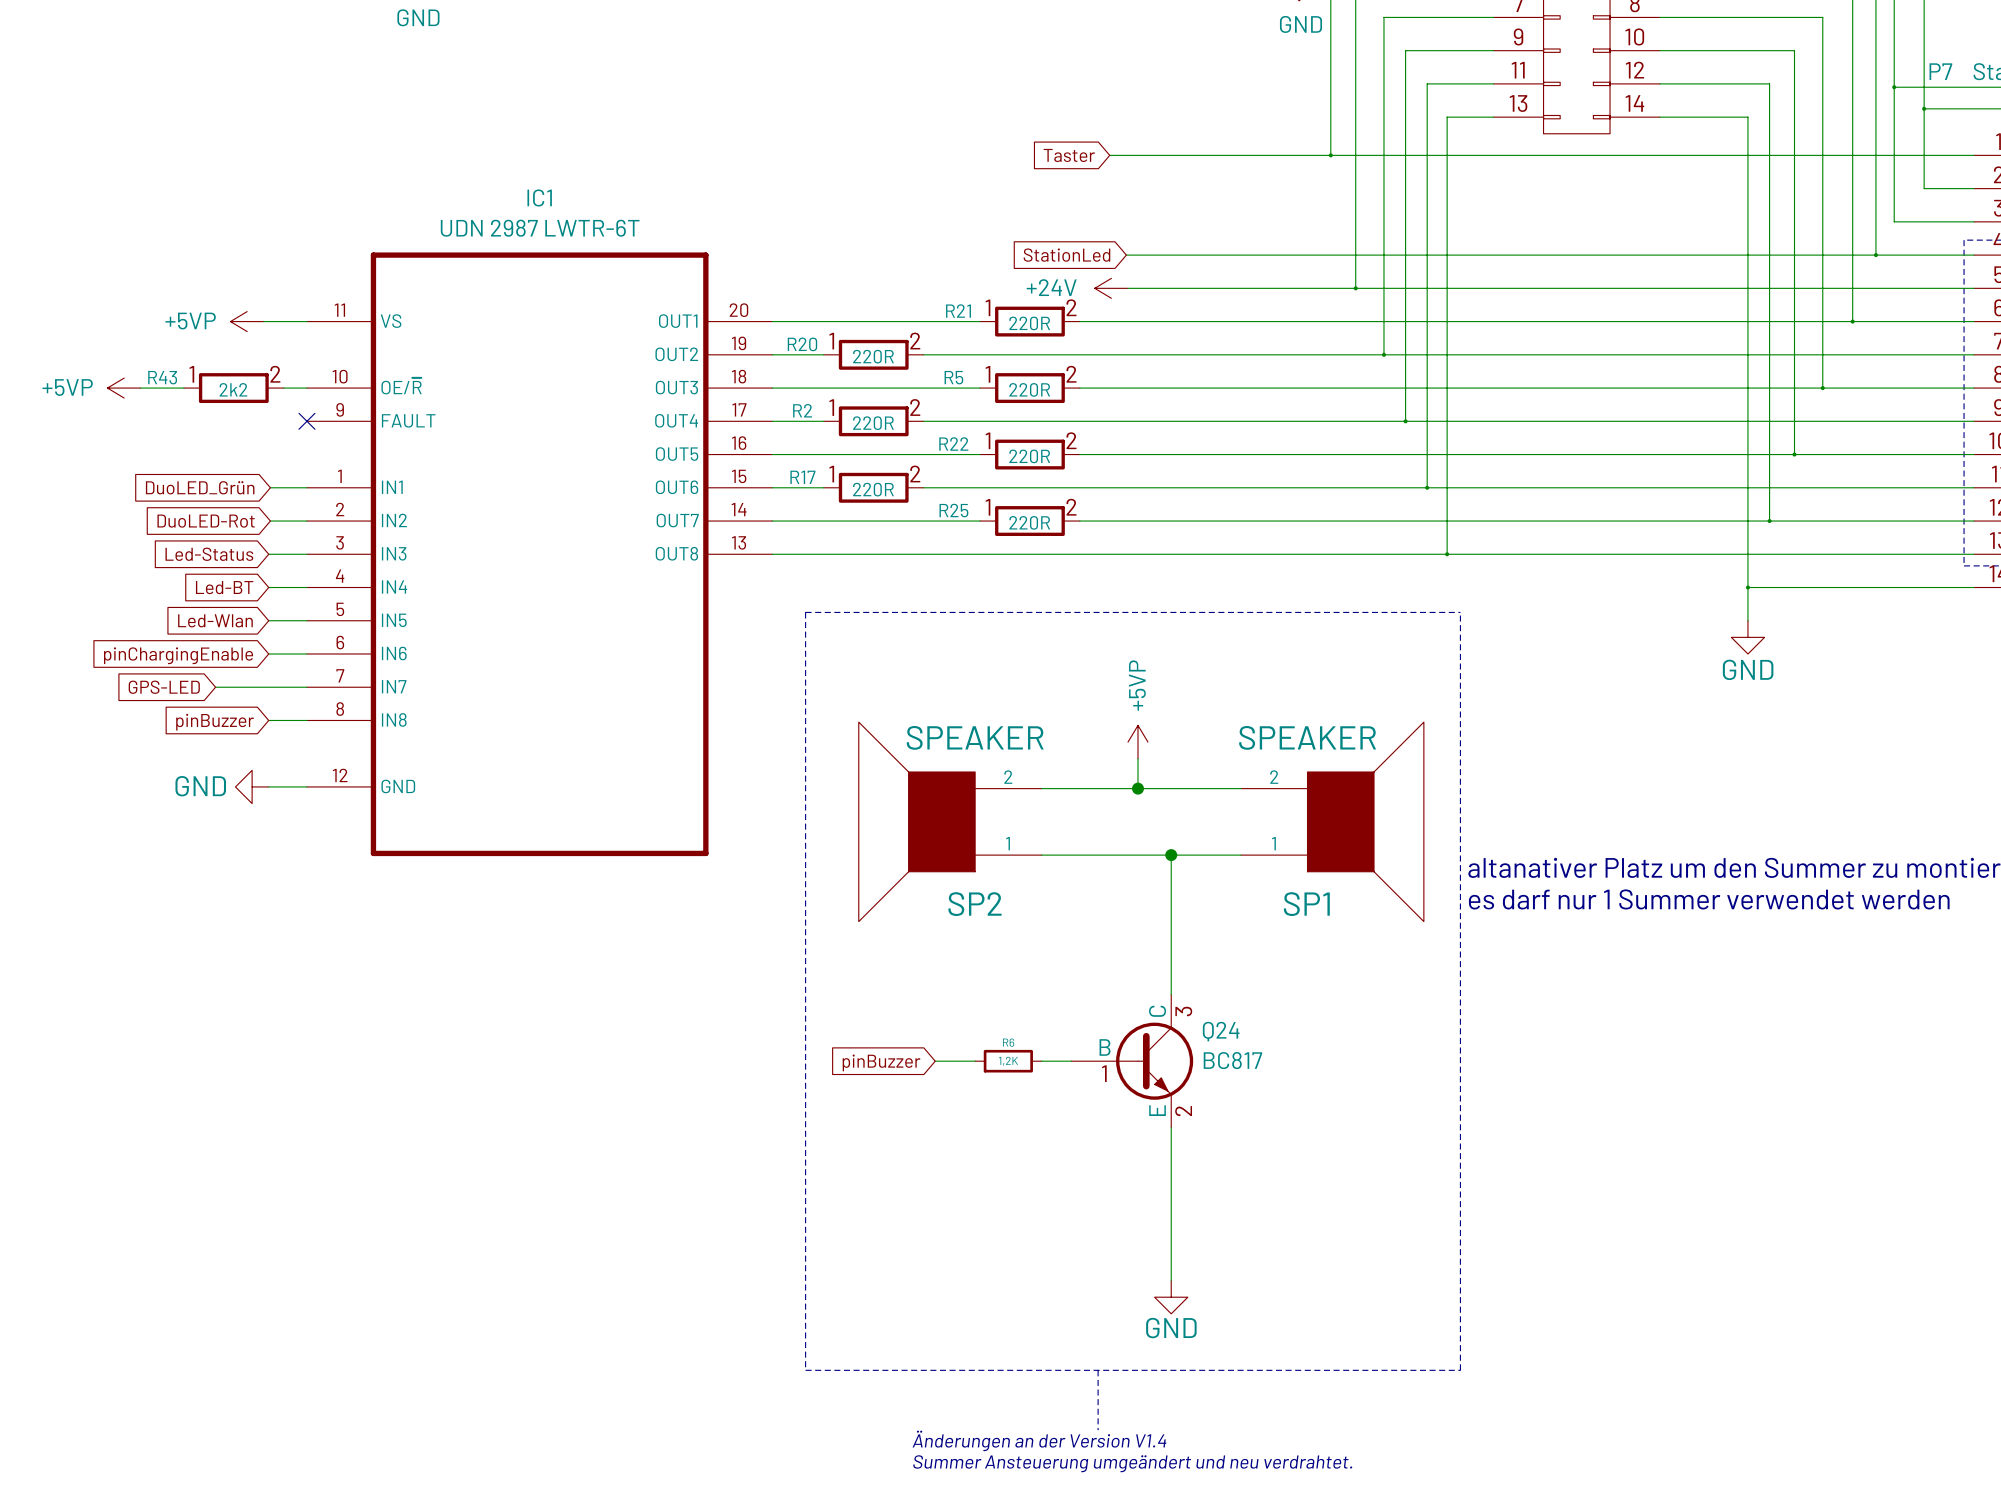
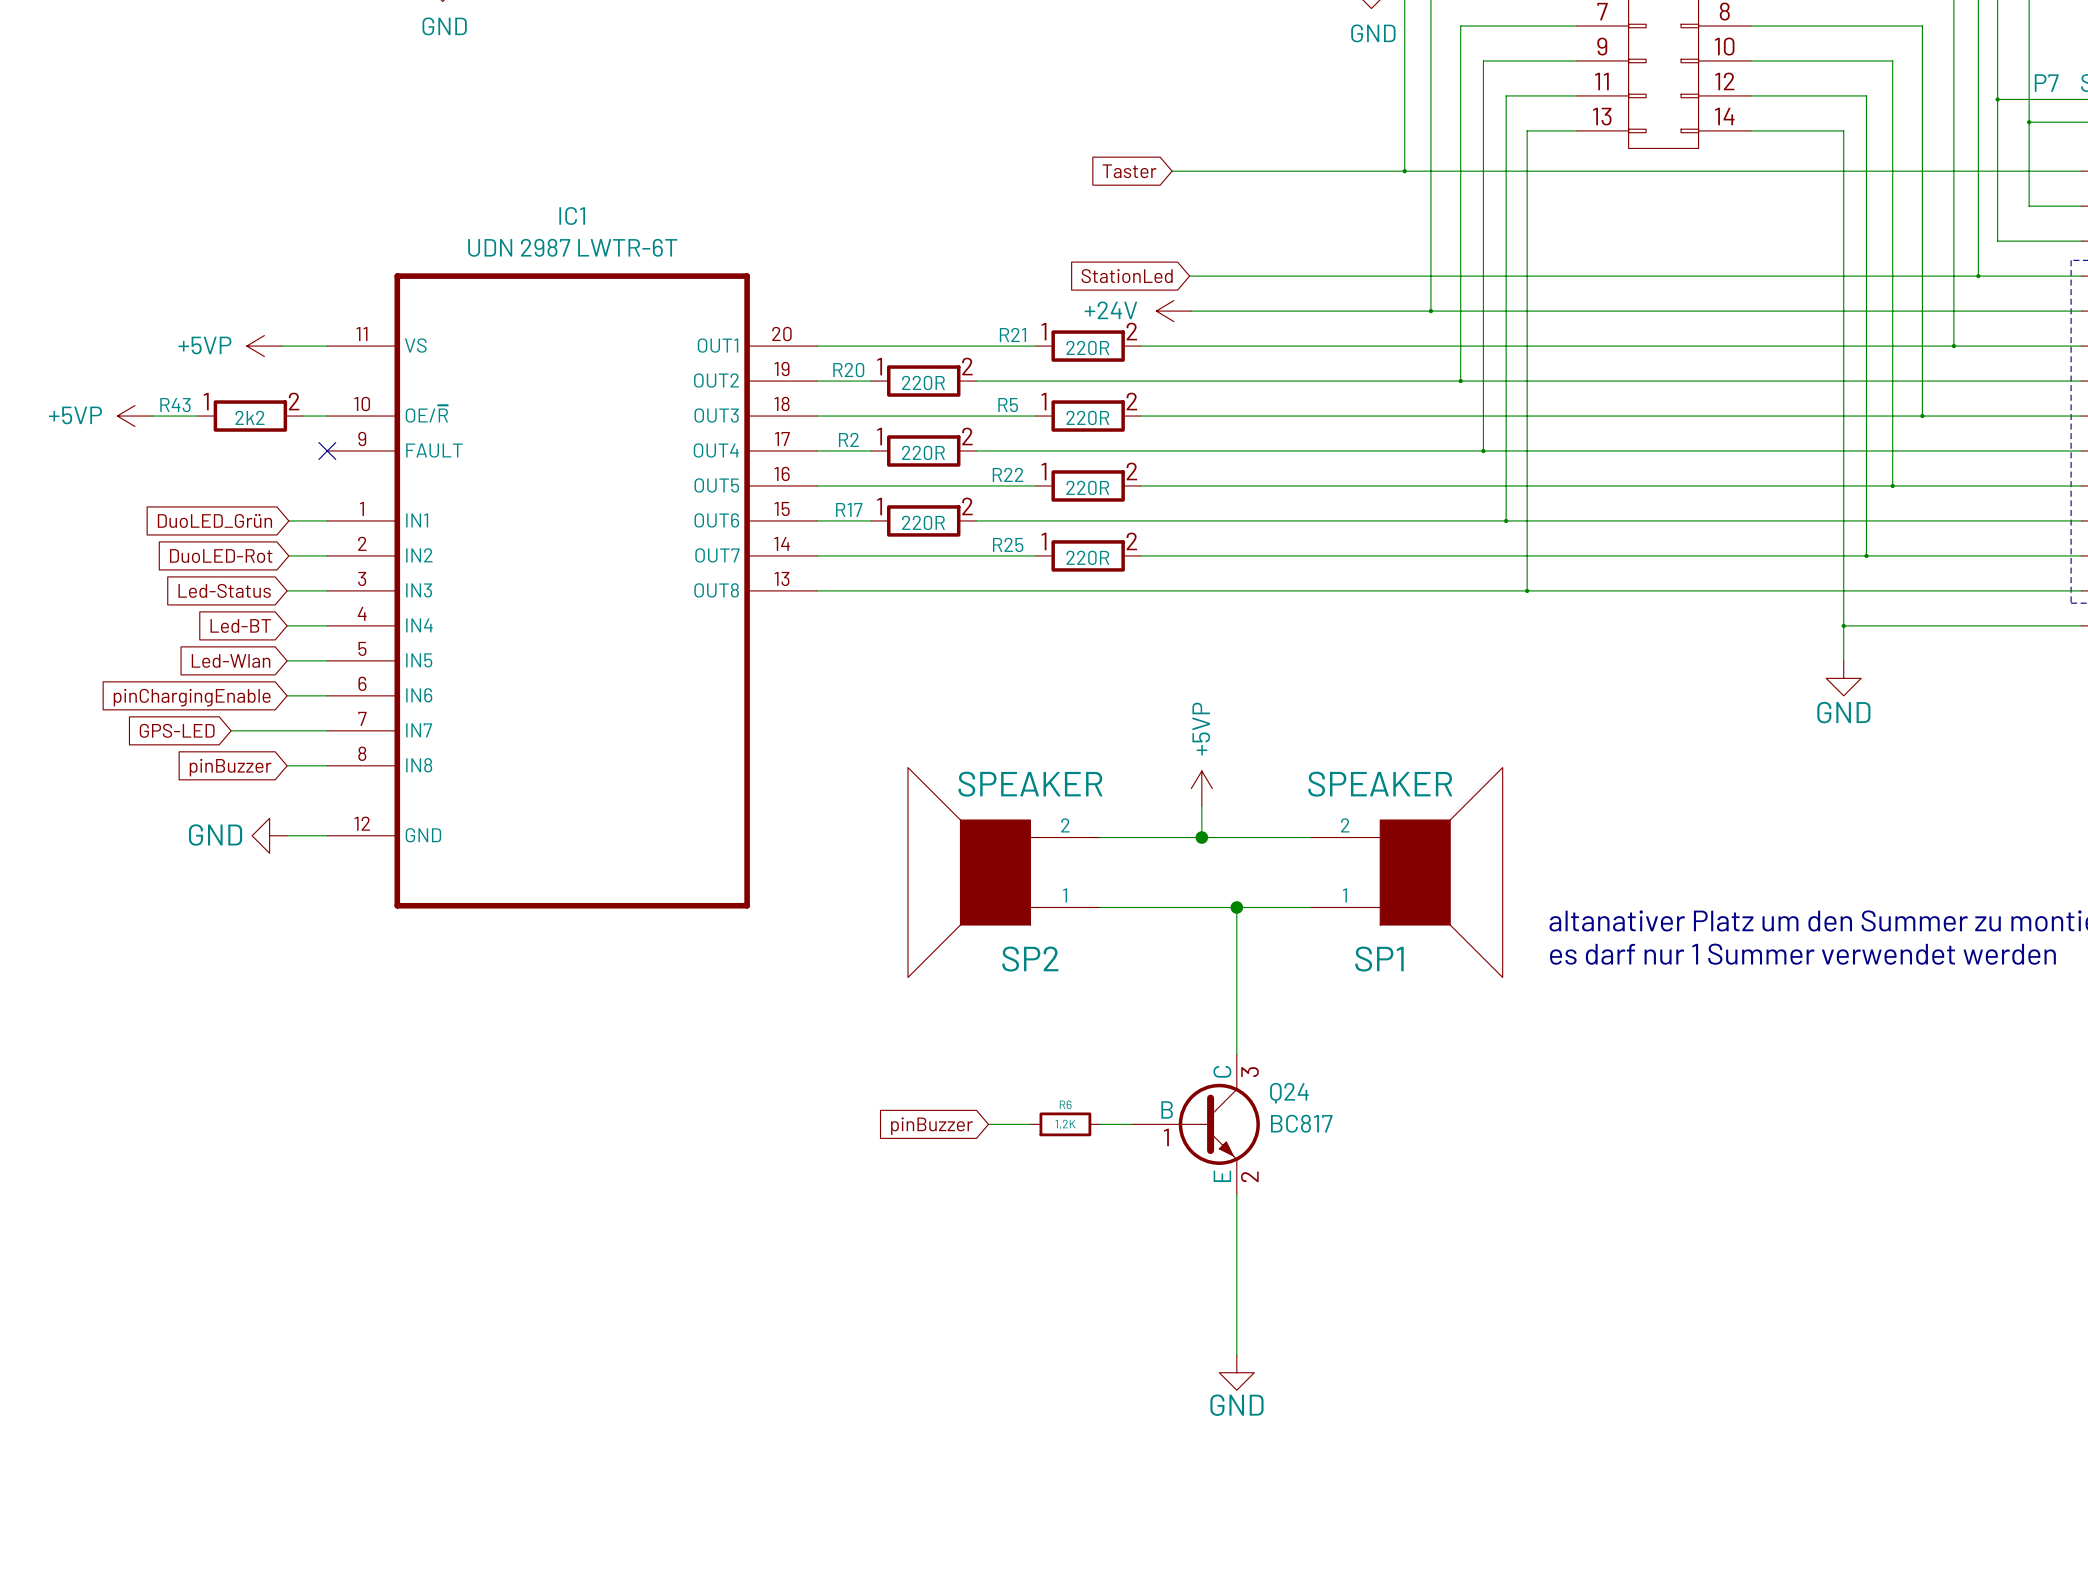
line: (805, 612) (805, 1370) (1460, 1370) (1460, 612) (805, 612) -> none
line: (1098, 1370) (1098, 1430) -> none
text: Änderungen an der Version V1.4 (1039, 1440) -> none
text: Summer Ansteuerung umgeändert und neu verdrahtet. (1132, 1463) -> none

